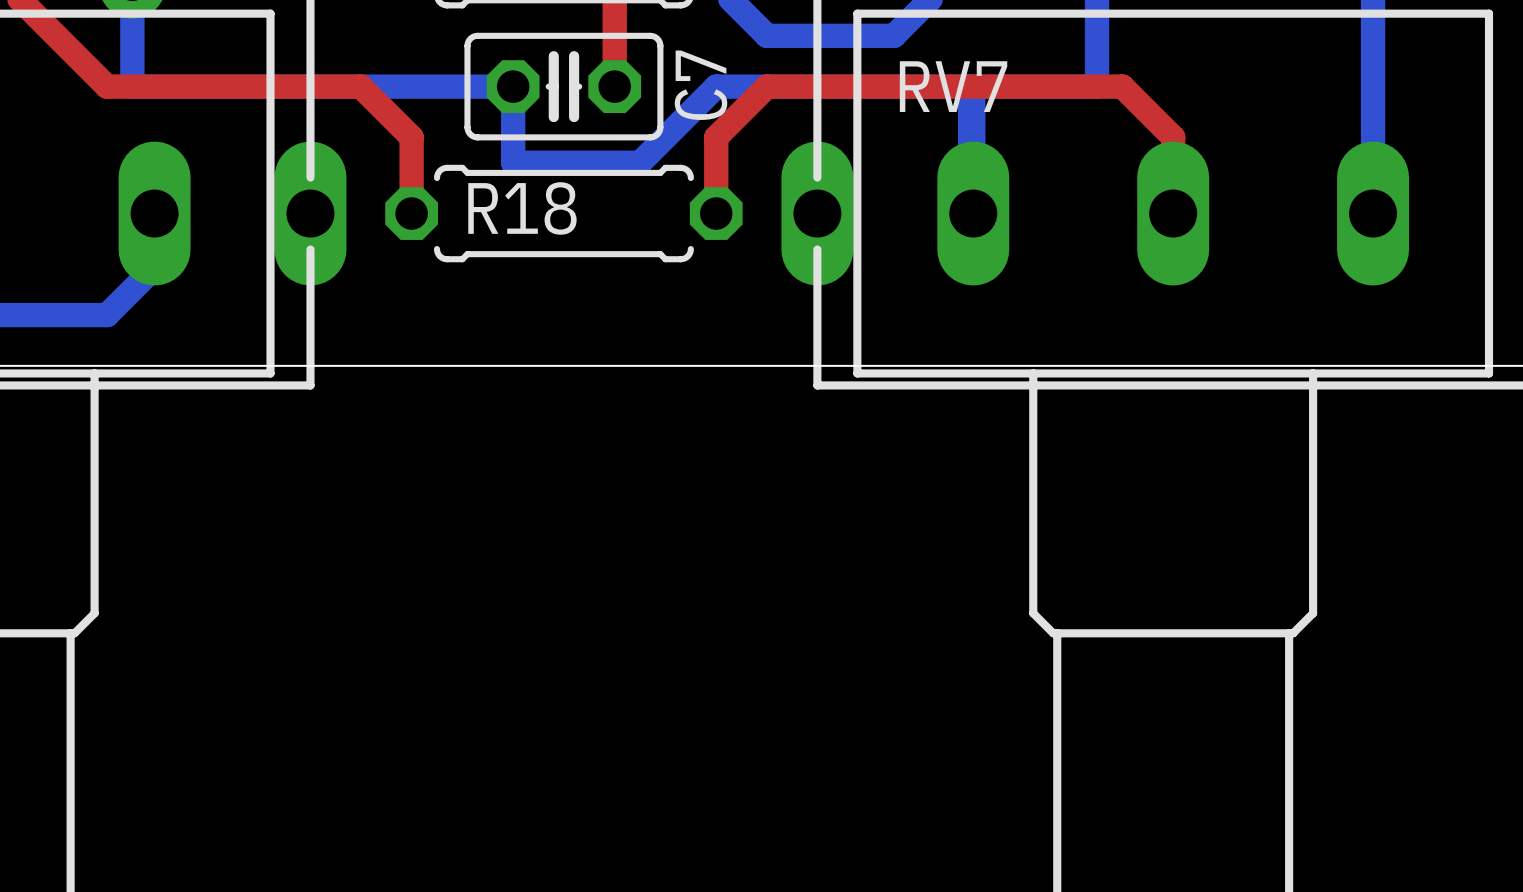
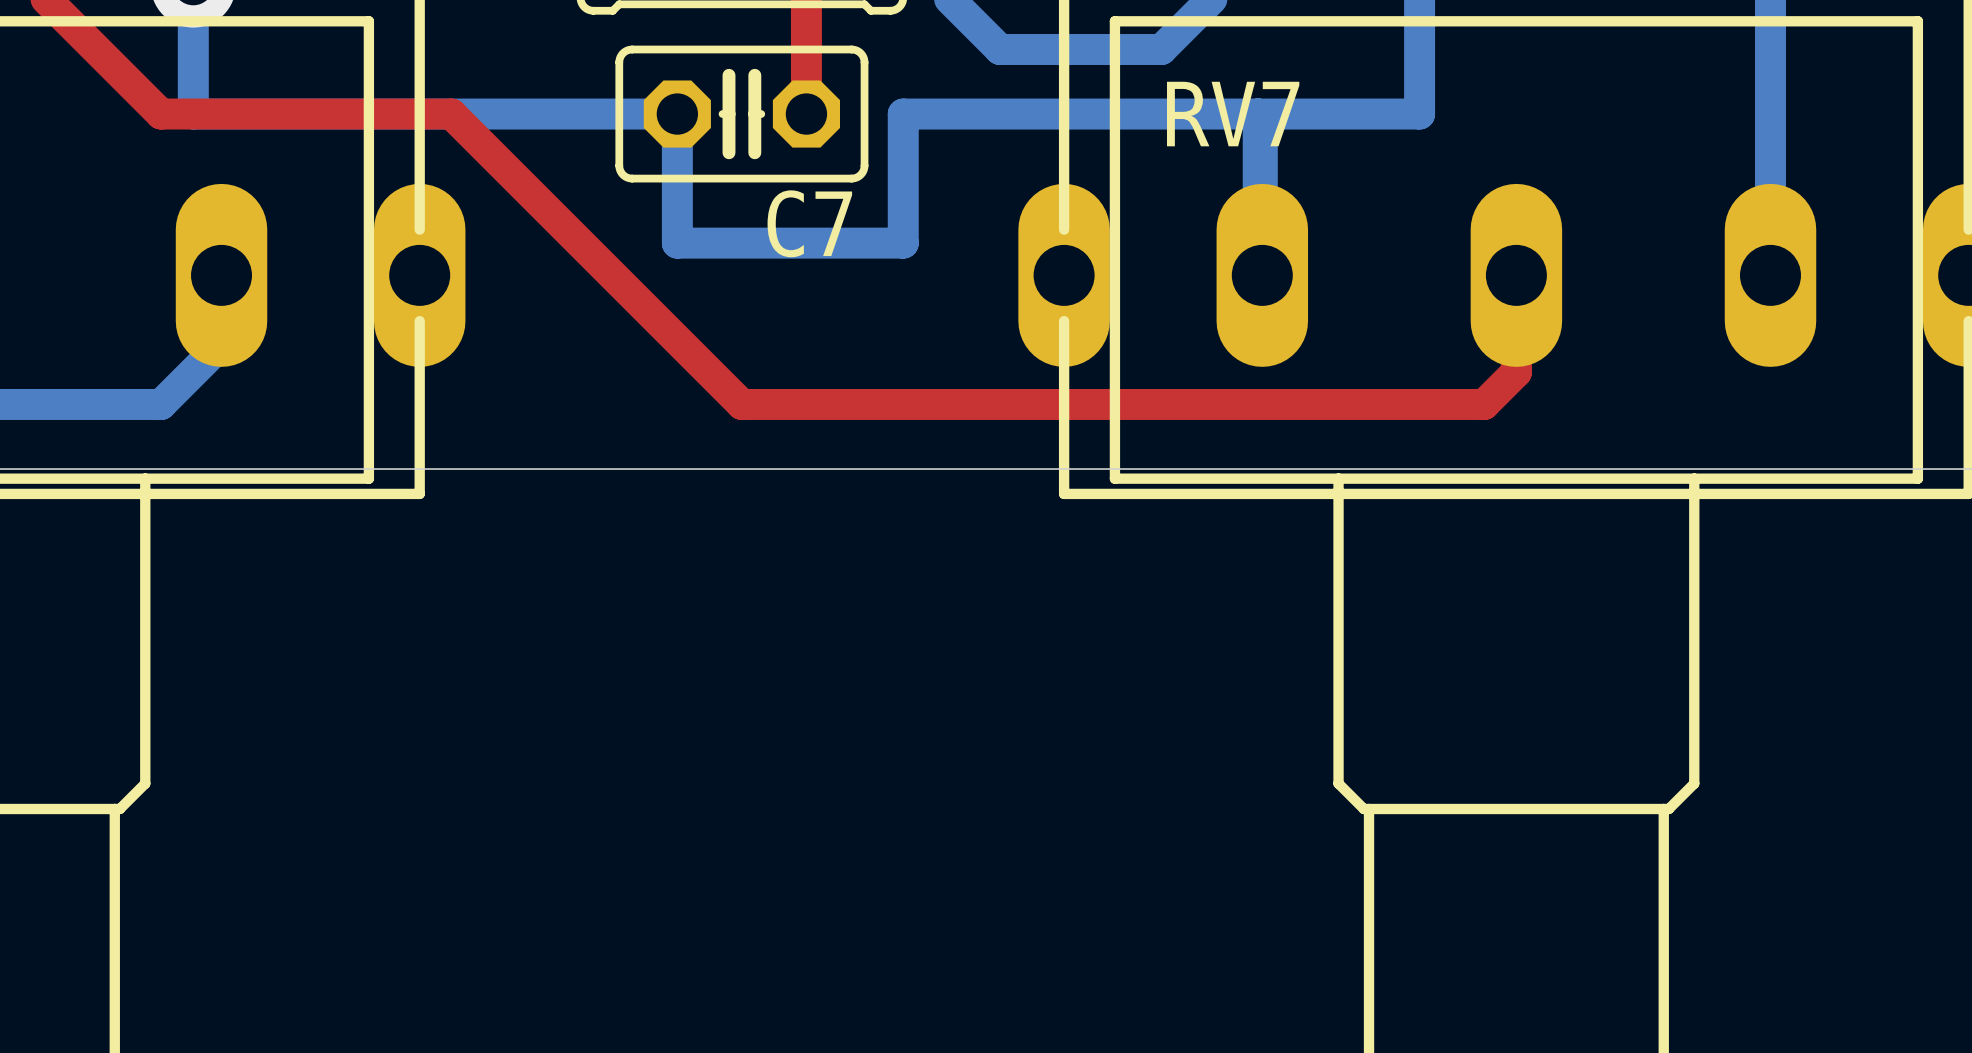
C7 name rotation: 0° (701, 85) -> 90° clockwise (809, 223)
C7 name position: C7 (701, 85) -> C7 (809, 223)
top track: (335, 86) (360, 86) (411, 137) (411, 213) -> none
bottom track: (716, 86) (640, 162) (513, 162) -> (935, 114) (903, 114) (903, 243) (677, 243) (677, 210)
R18: (563, 213) -> none
top track: (716, 213) (716, 137) (767, 86) (1122, 86) (1173, 137) (1173, 213) -> (451, 114) (741, 404) (1484, 404) (1516, 372) (1516, 275)

